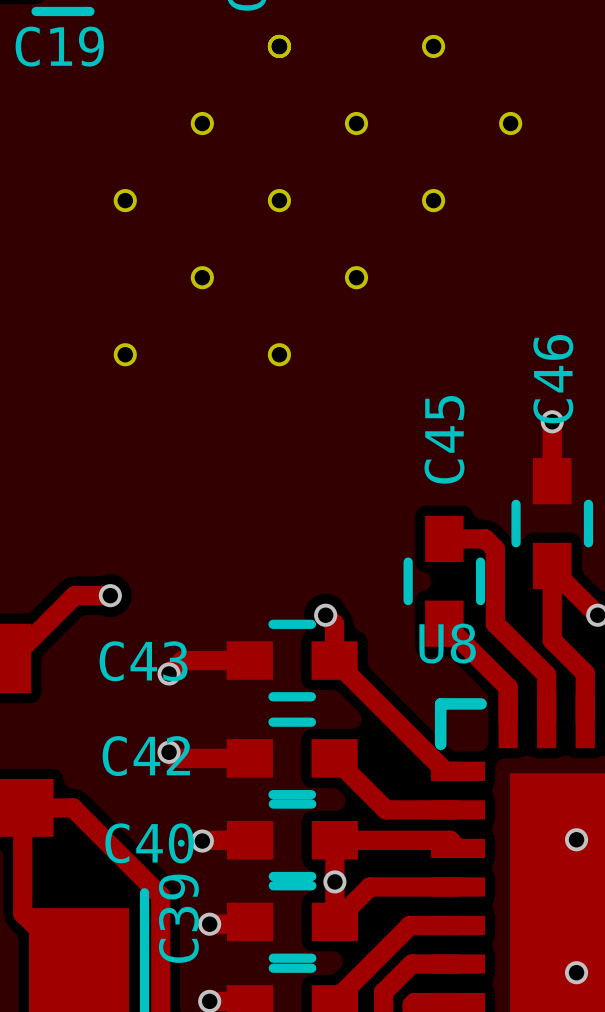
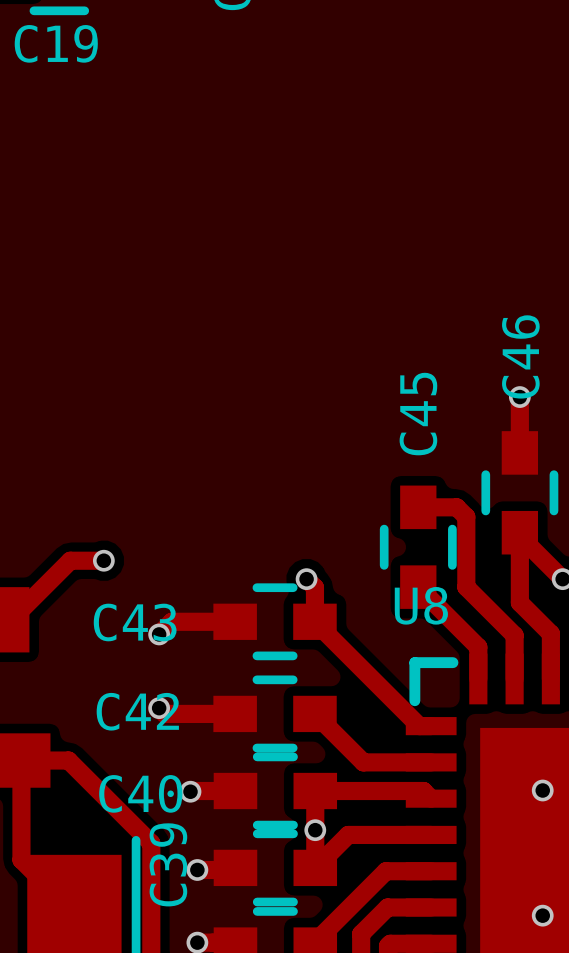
part: (279, 46) -> none
part: (433, 46) -> none
part: (202, 123) -> none
part: (356, 123) -> none
part: (510, 123) -> none
part: (125, 200) -> none
part: (279, 200) -> none
part: (433, 200) -> none
part: (202, 277) -> none
part: (356, 277) -> none
part: (125, 354) -> none
part: (279, 354) -> none

